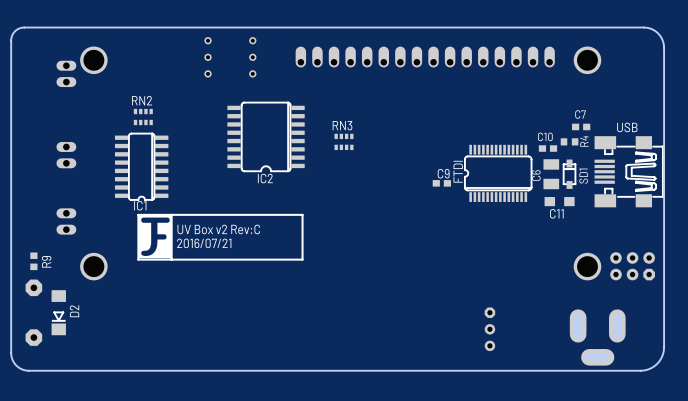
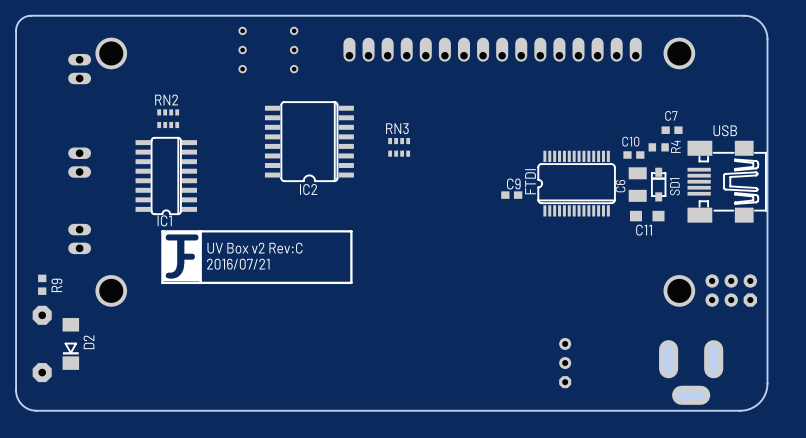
part rotation: 0° (489, 329) -> 180° (565, 363)

